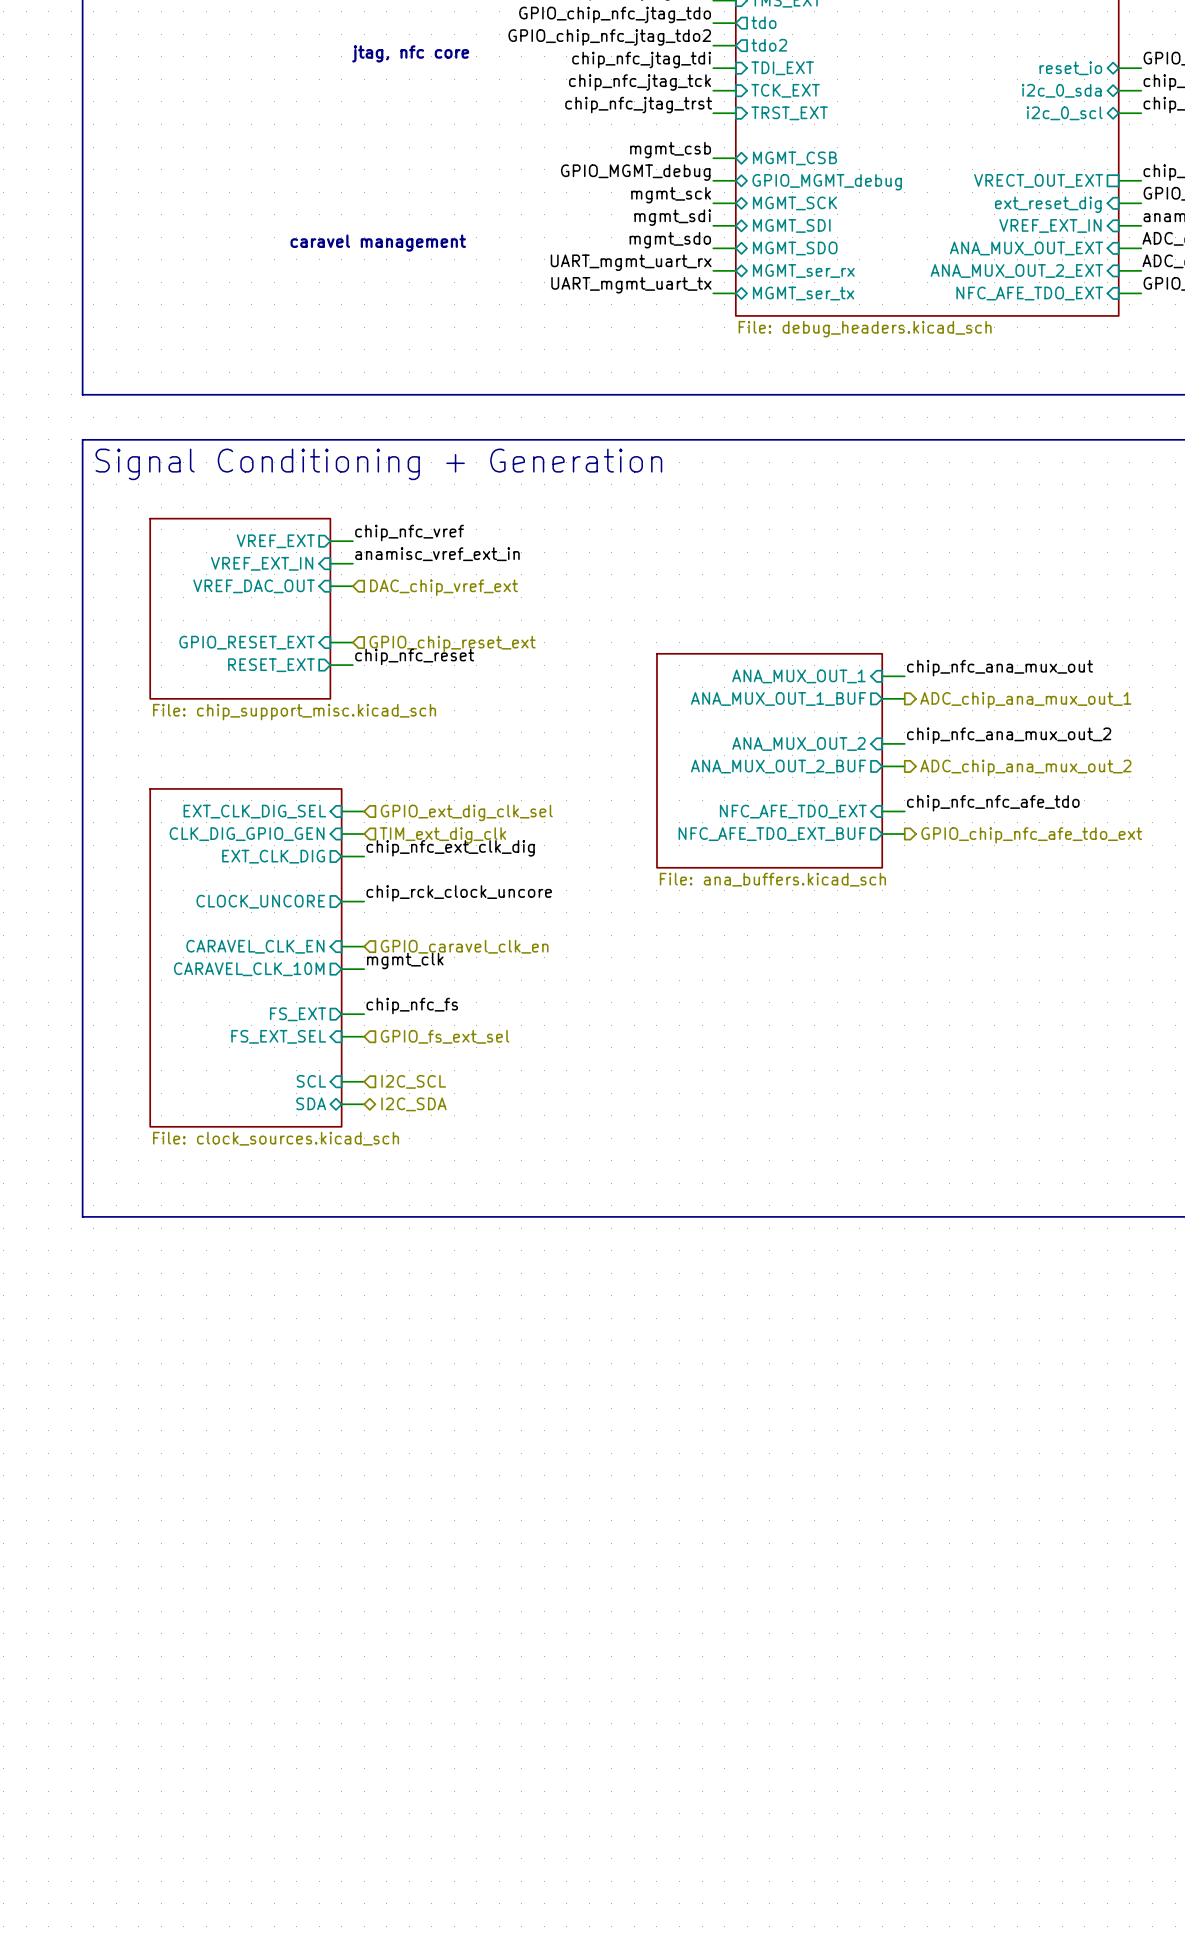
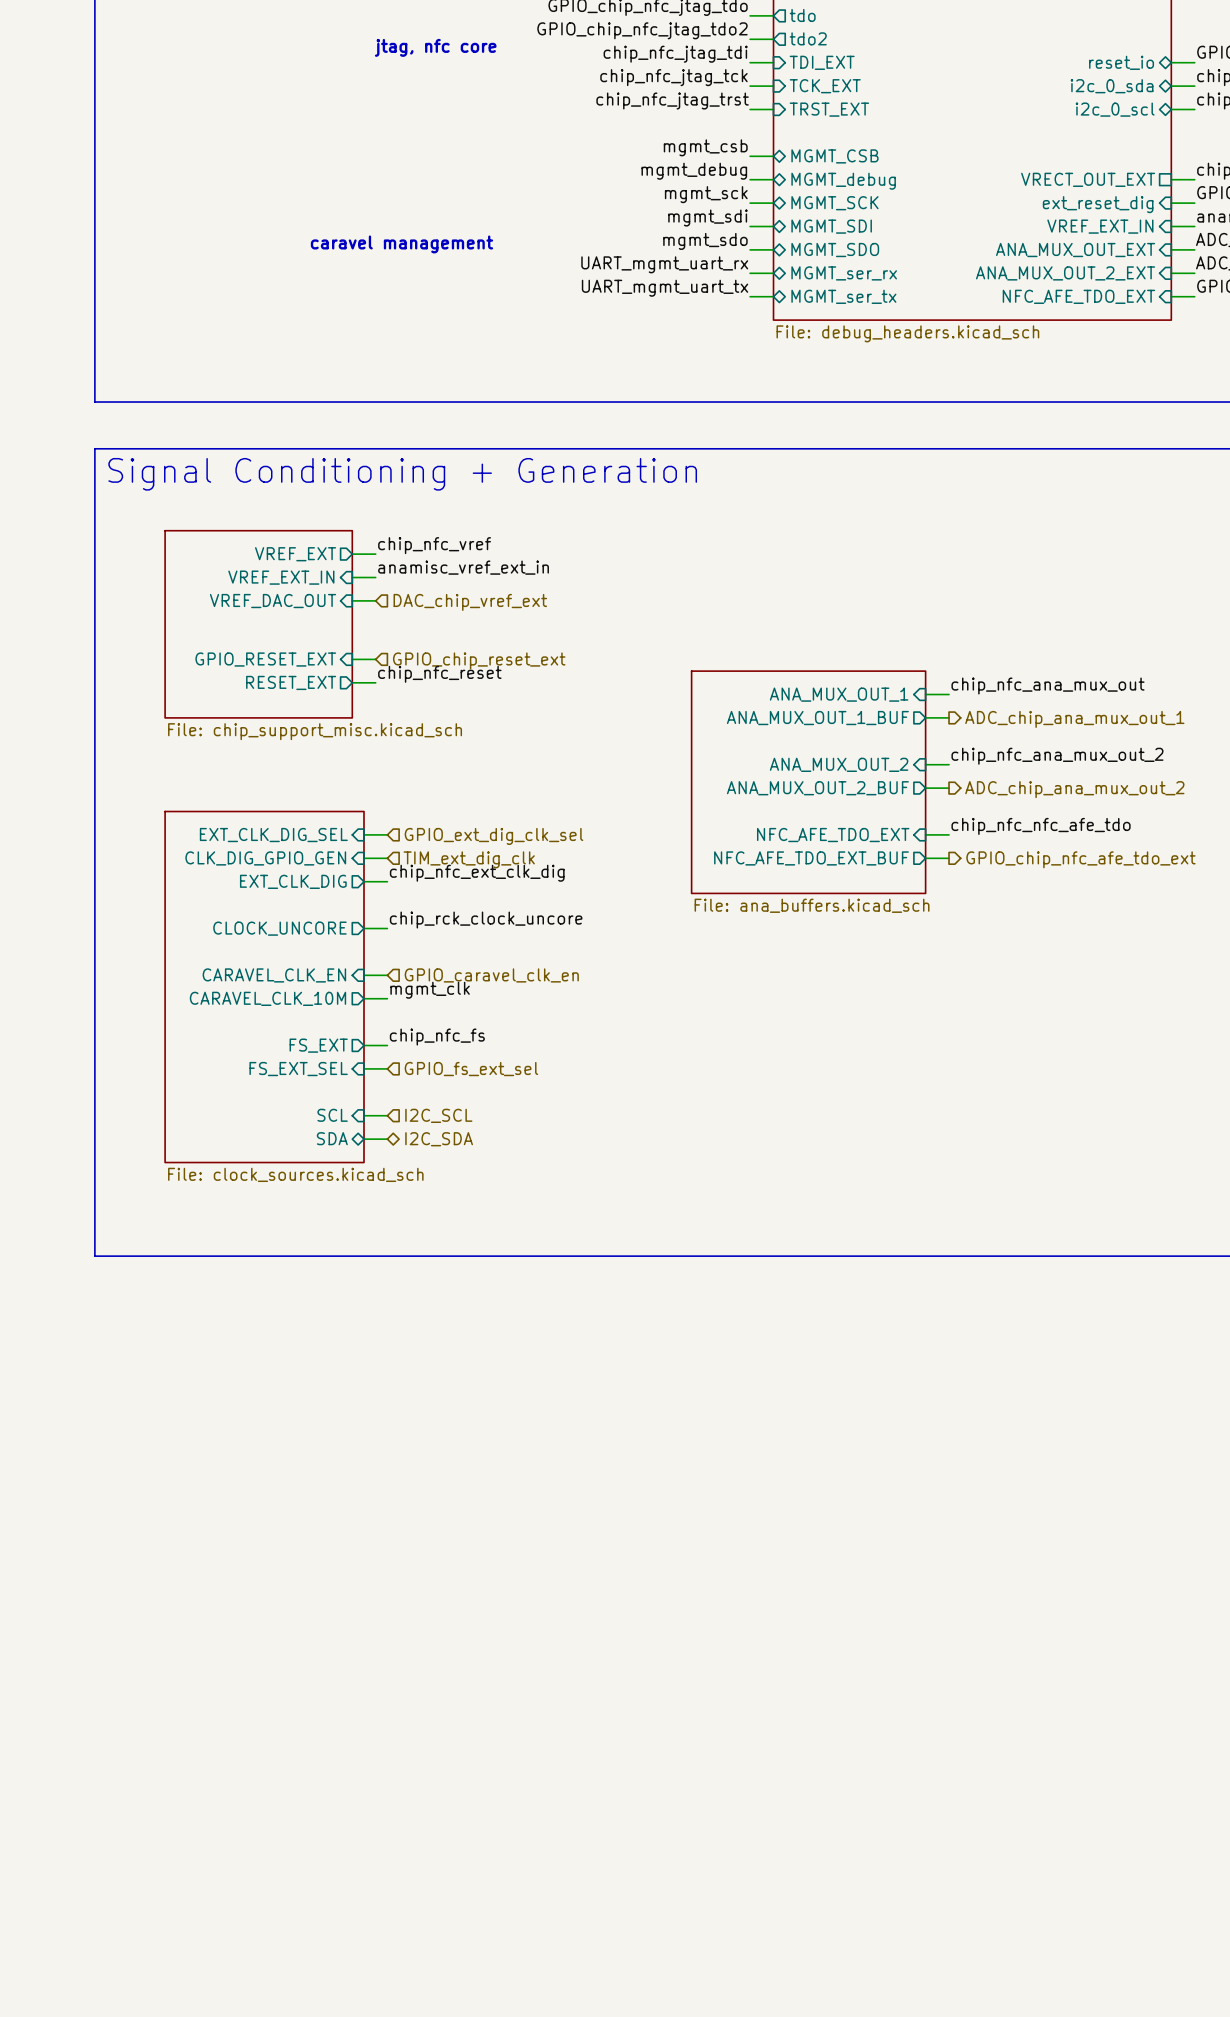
label: GPIO_MGMT_debug (635, 172) -> mgmt_debug (694, 171)
sheet pin: GPIO_MGMT_debug (827, 182) -> MGMT_debug (843, 181)

